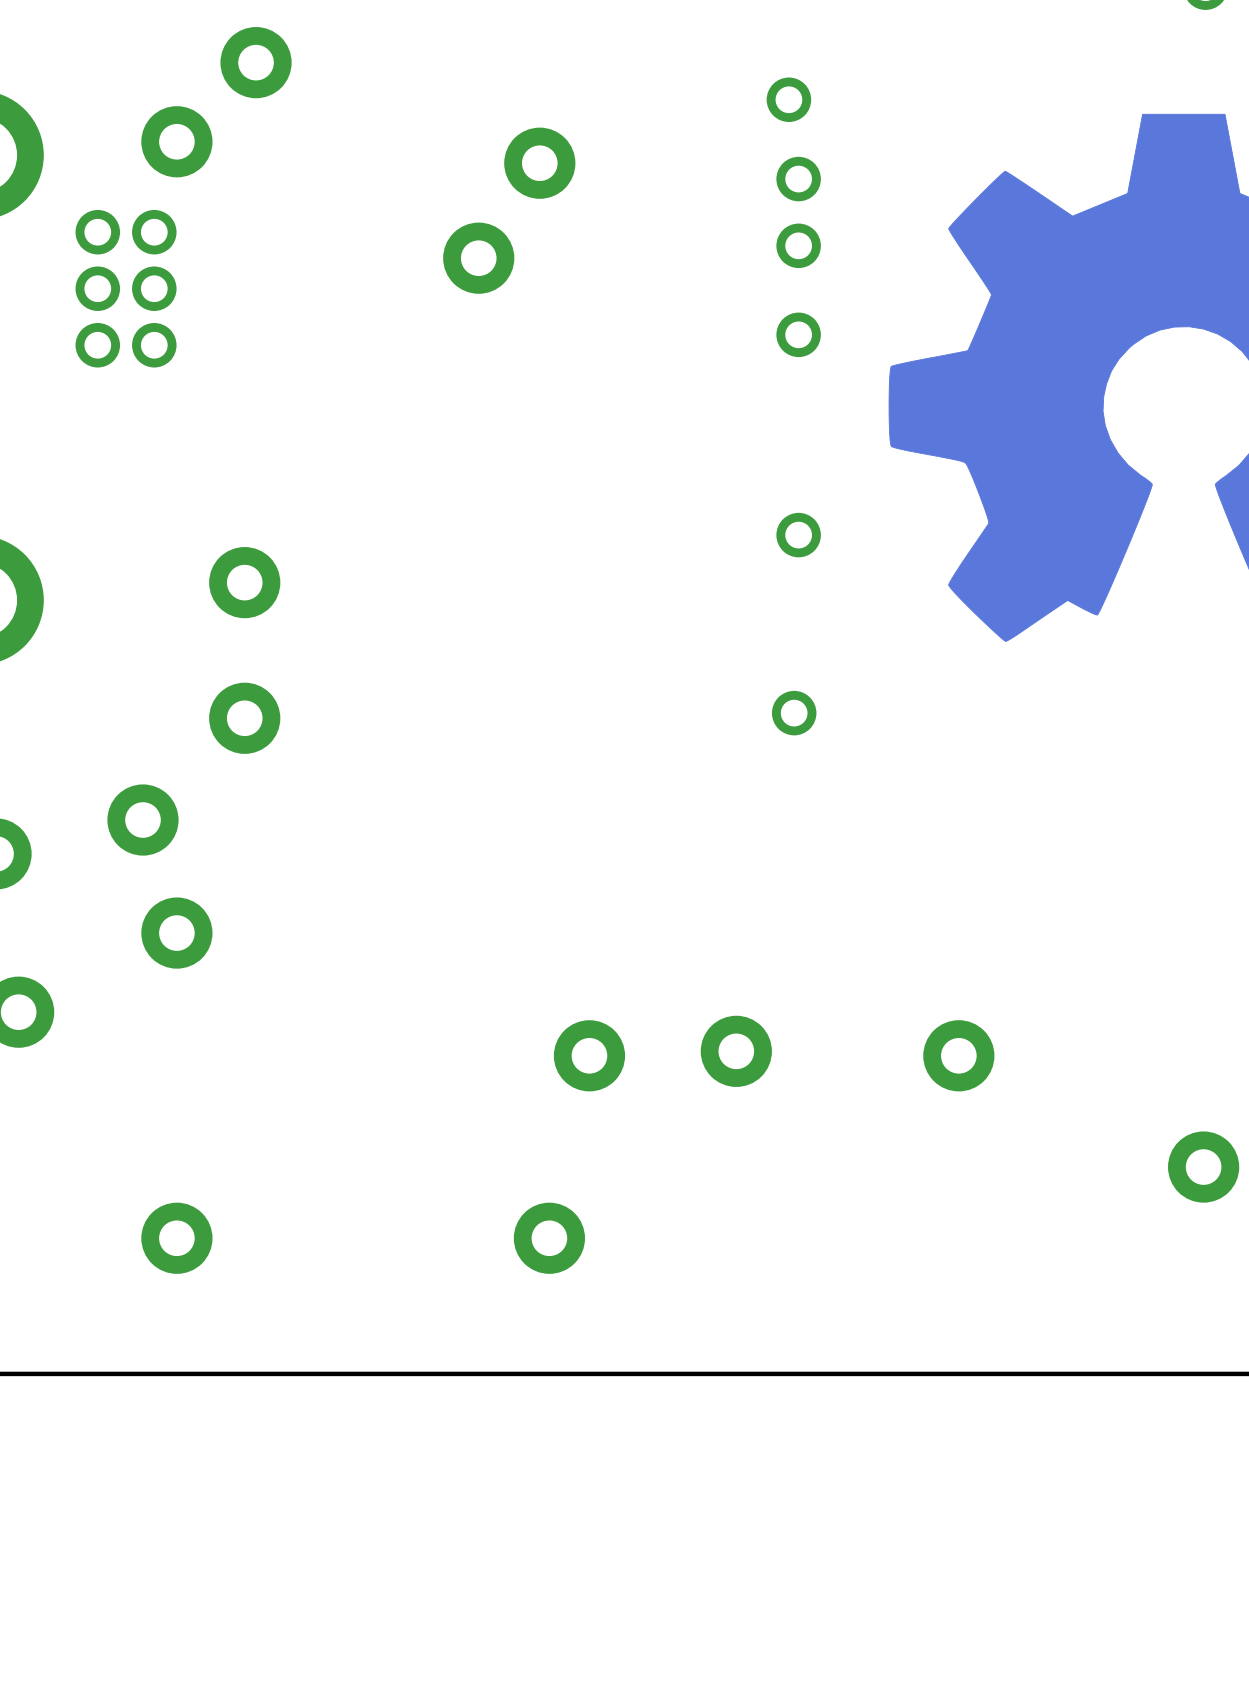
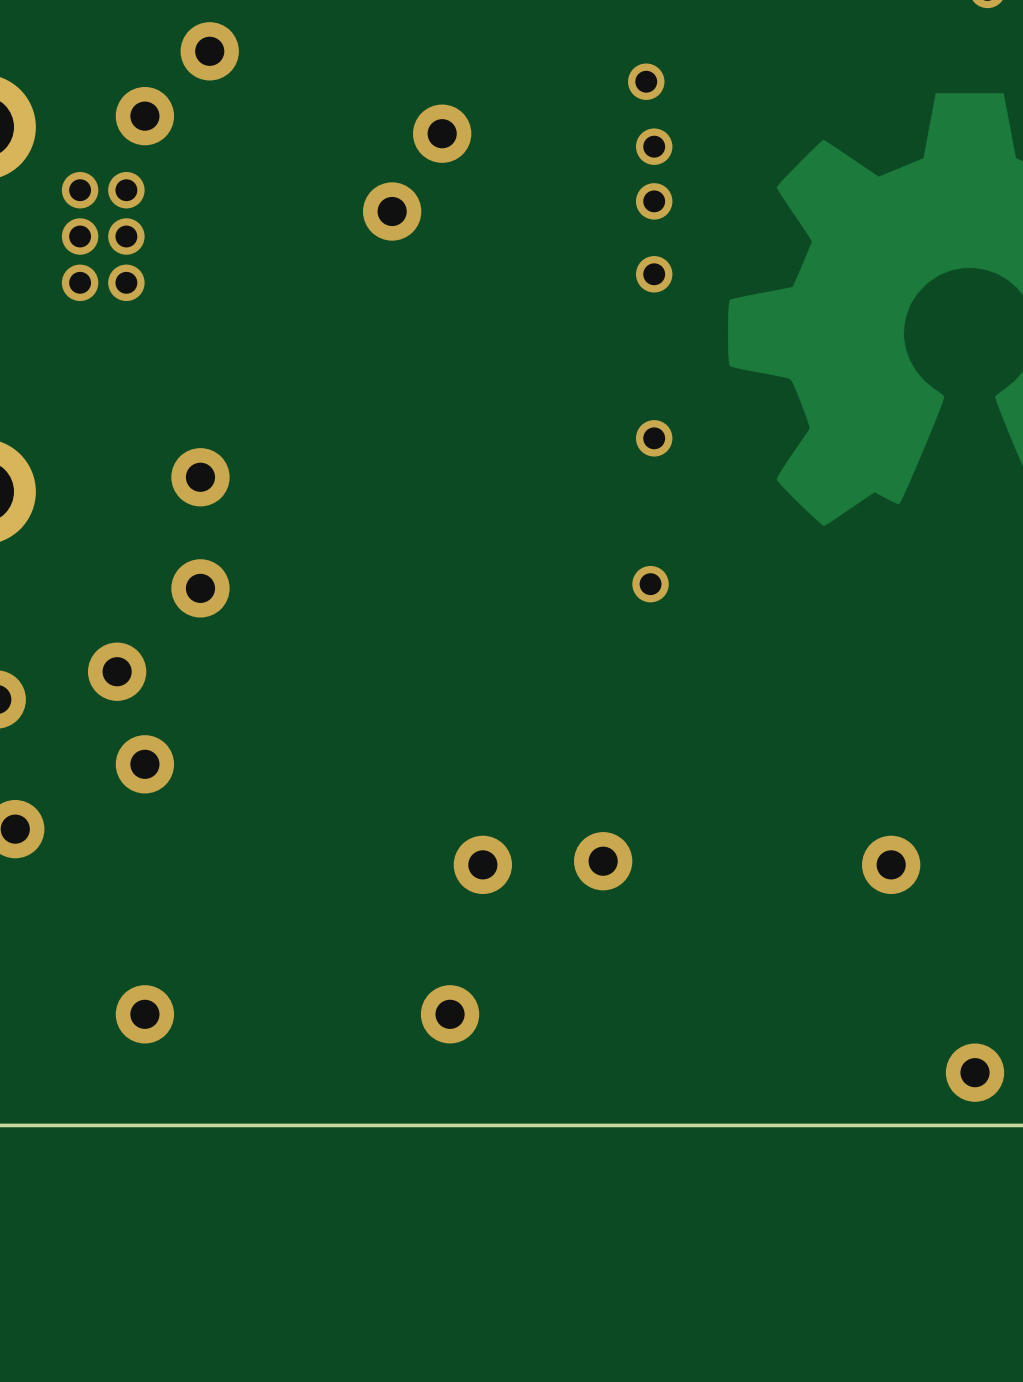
via: (958, 1055) -> none
via: none -> (891, 864)
via: (1203, 1167) -> none
via: none -> (975, 1072)

